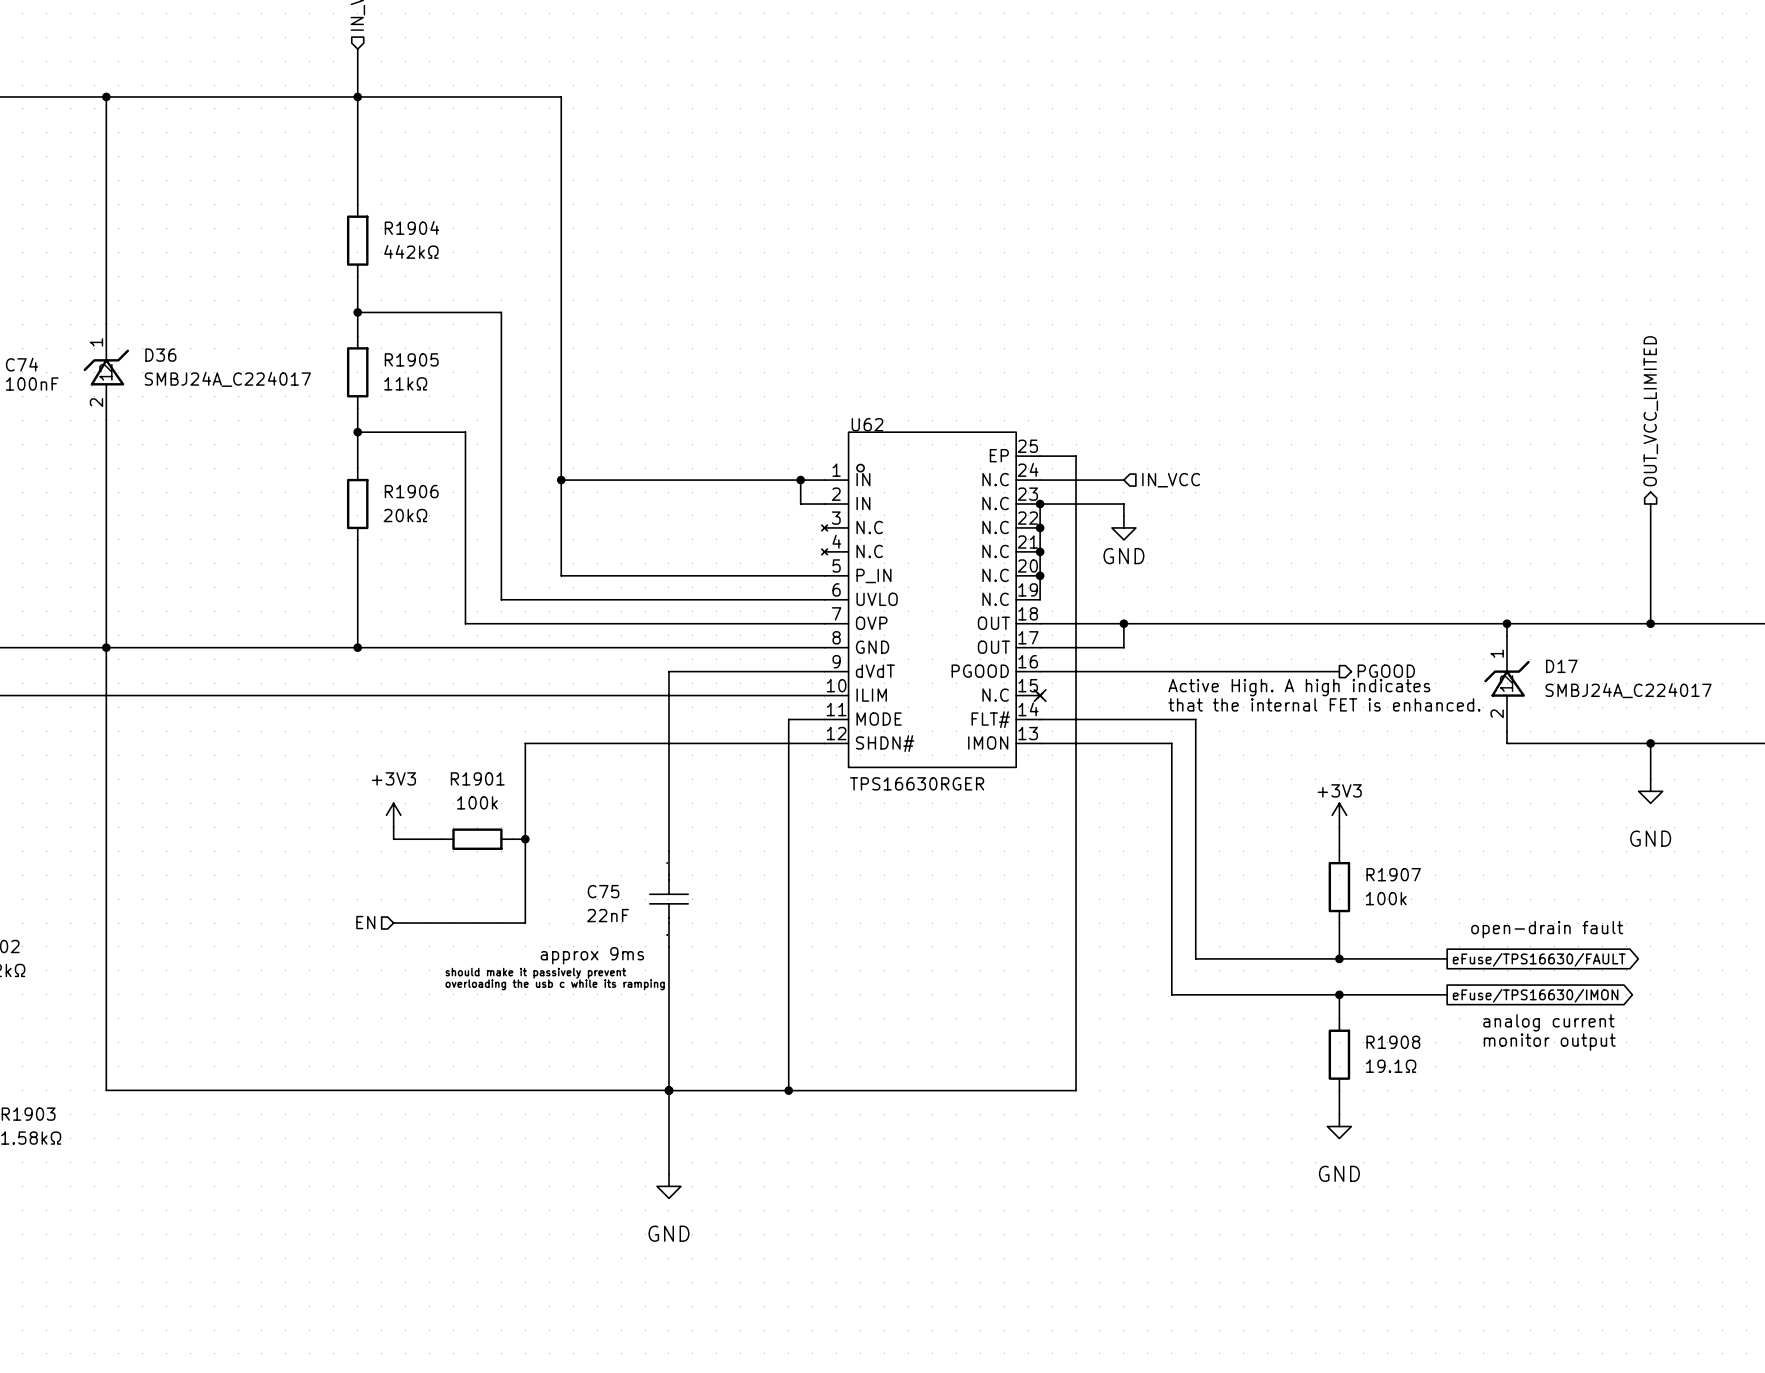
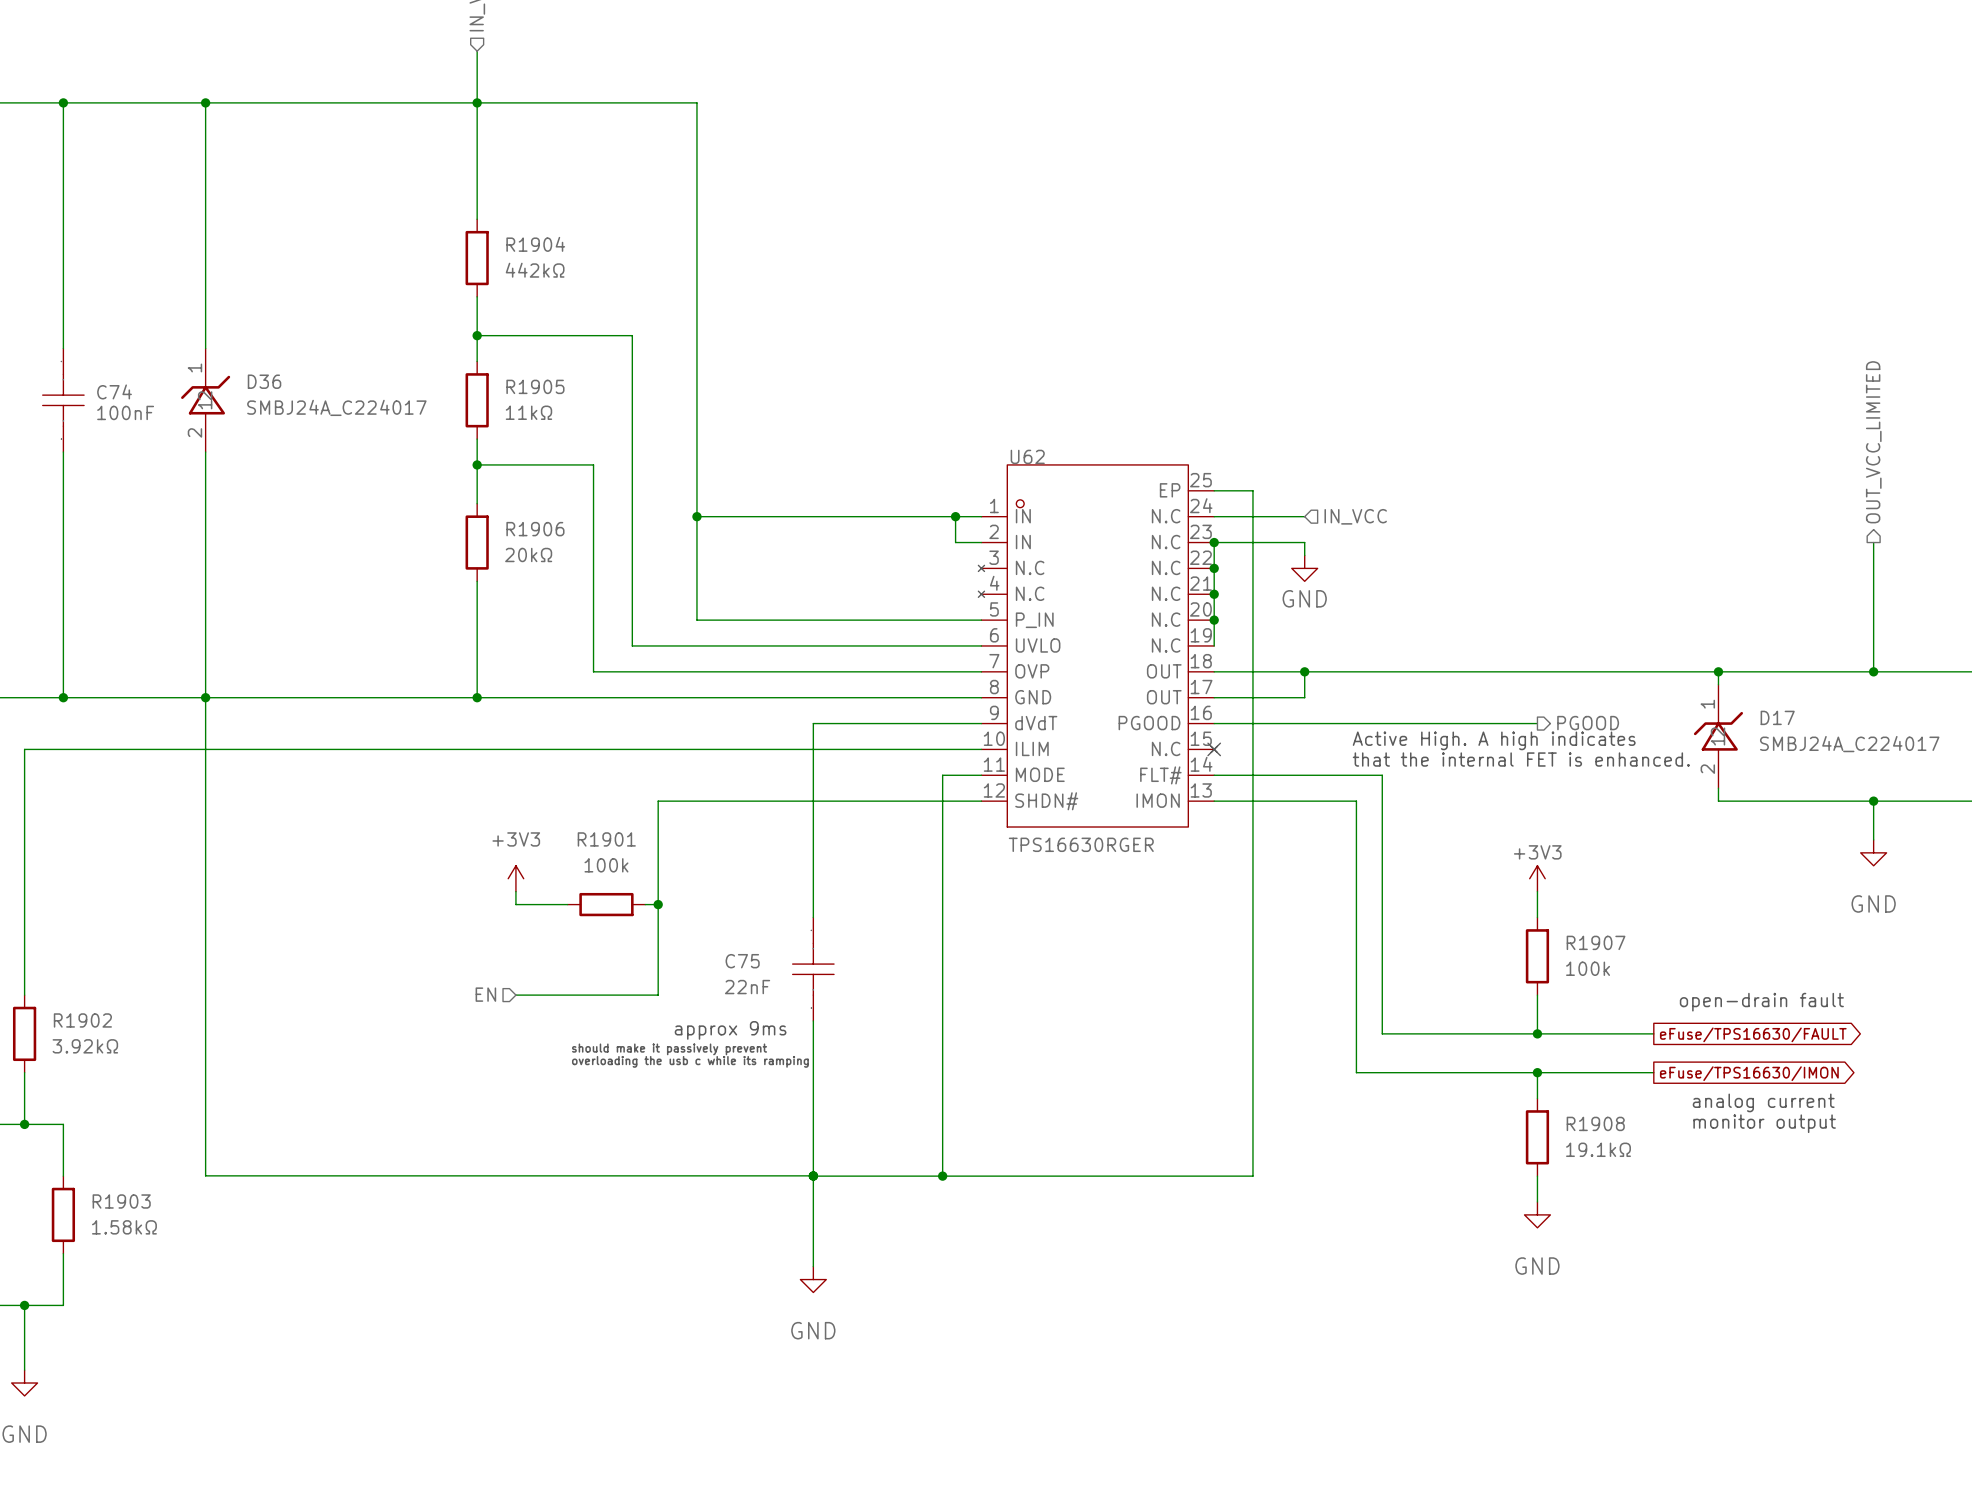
R1908 value: 19.1Ω (1391, 1066) -> 19.1kΩ (1598, 1149)

